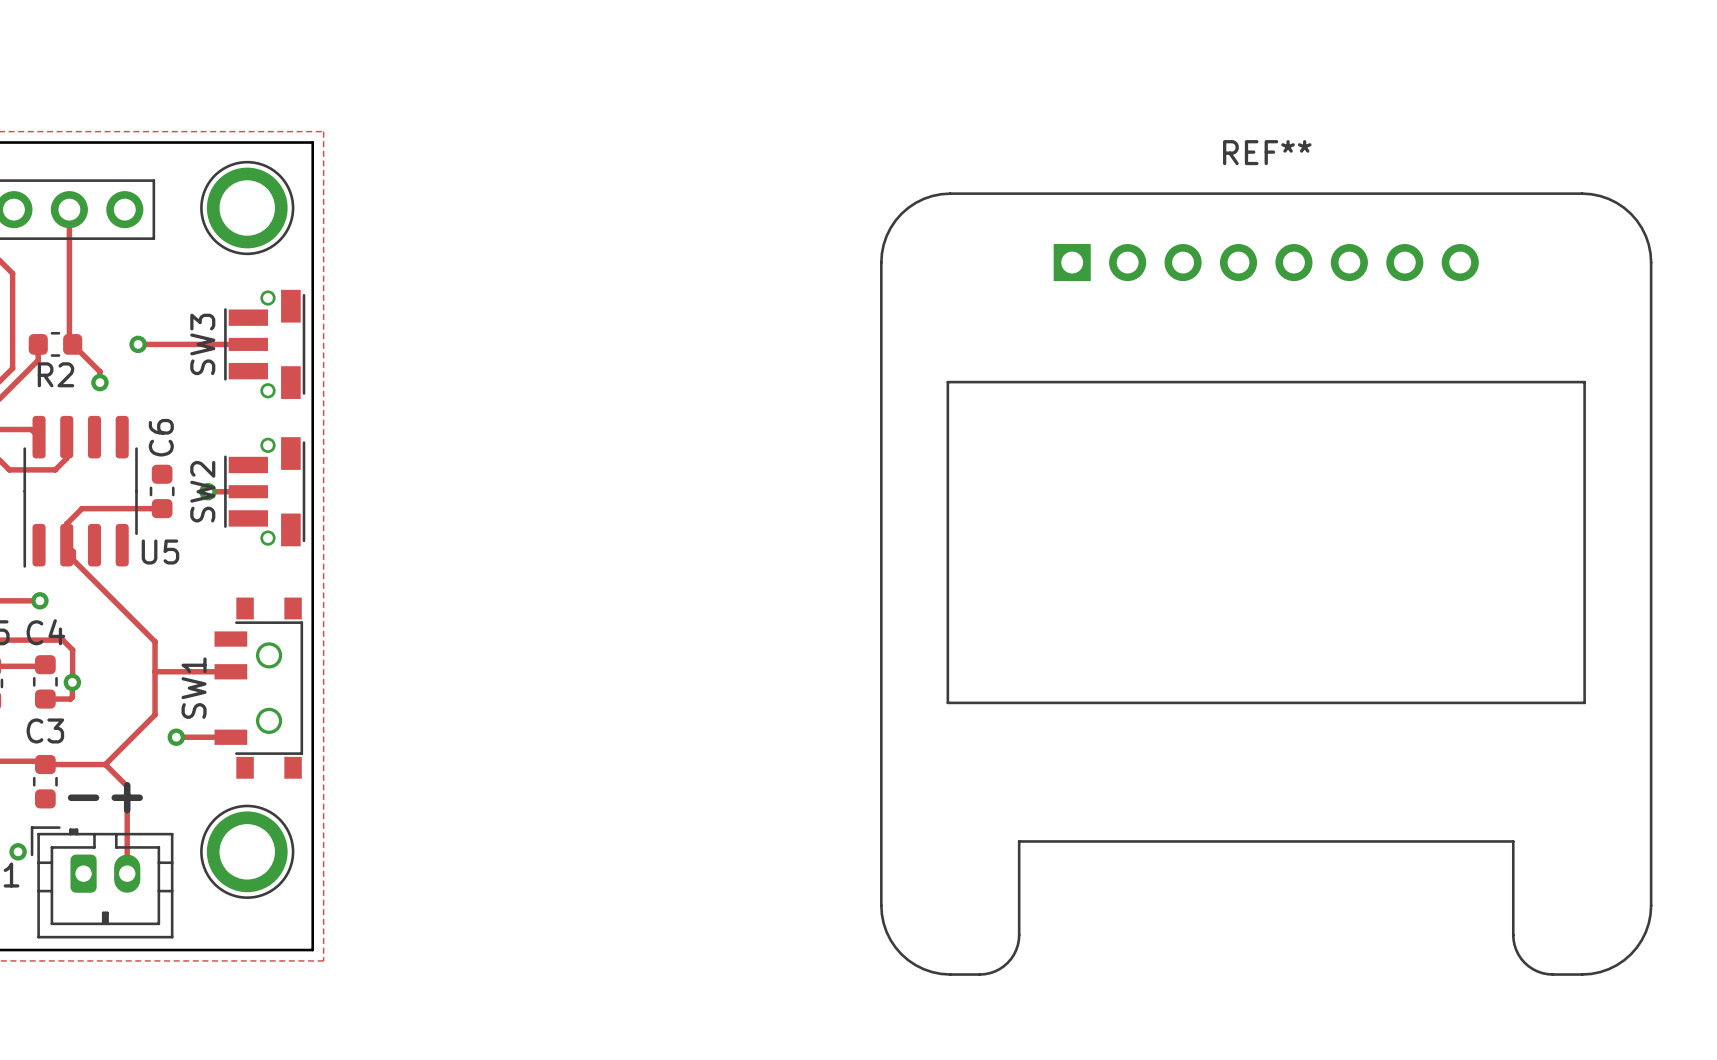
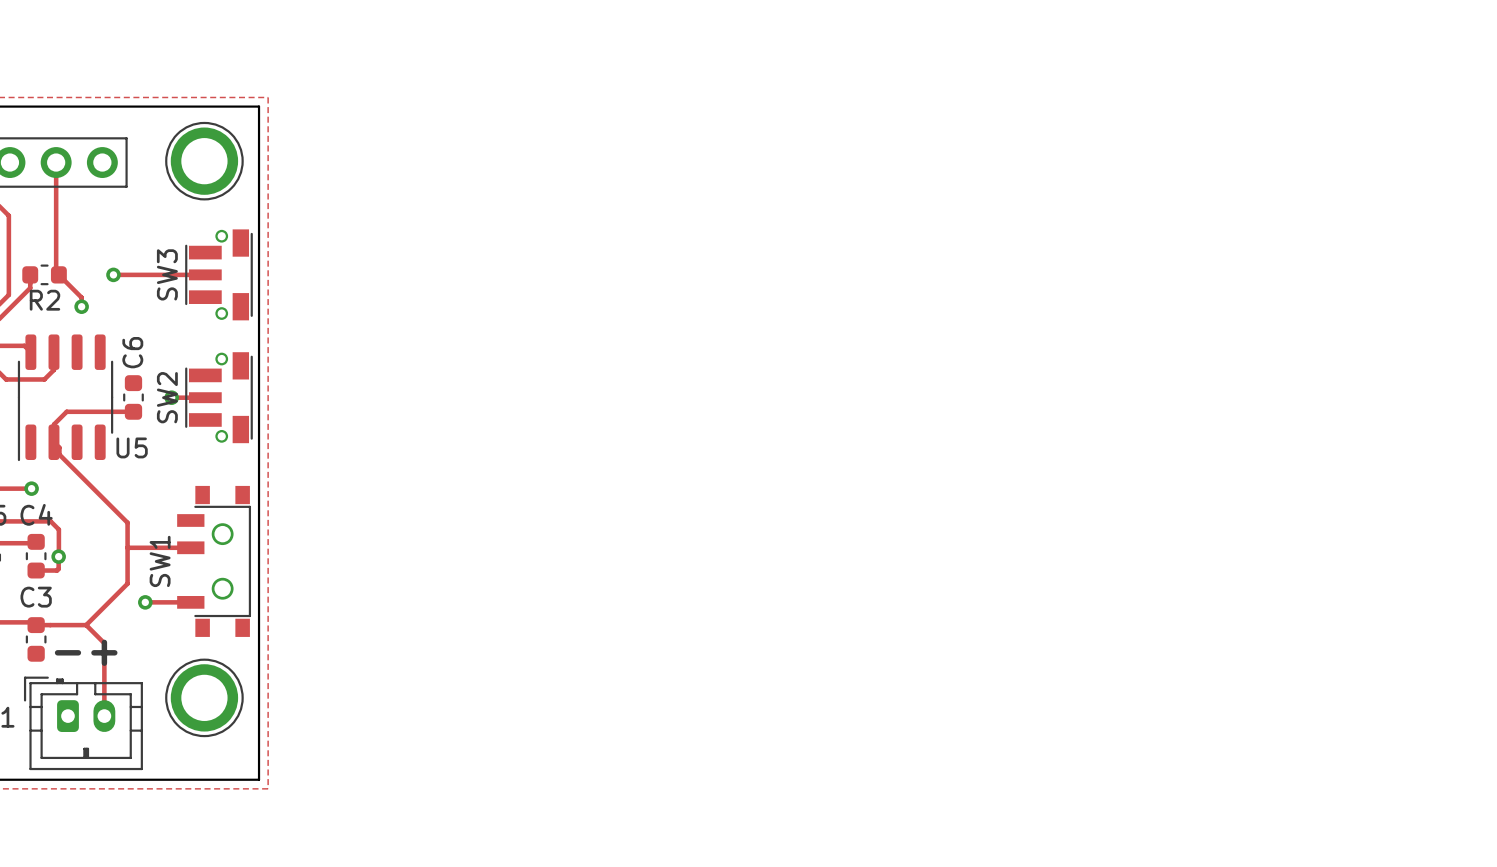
REF**: (1266, 584) -> none
via: (18, 851) -> none

